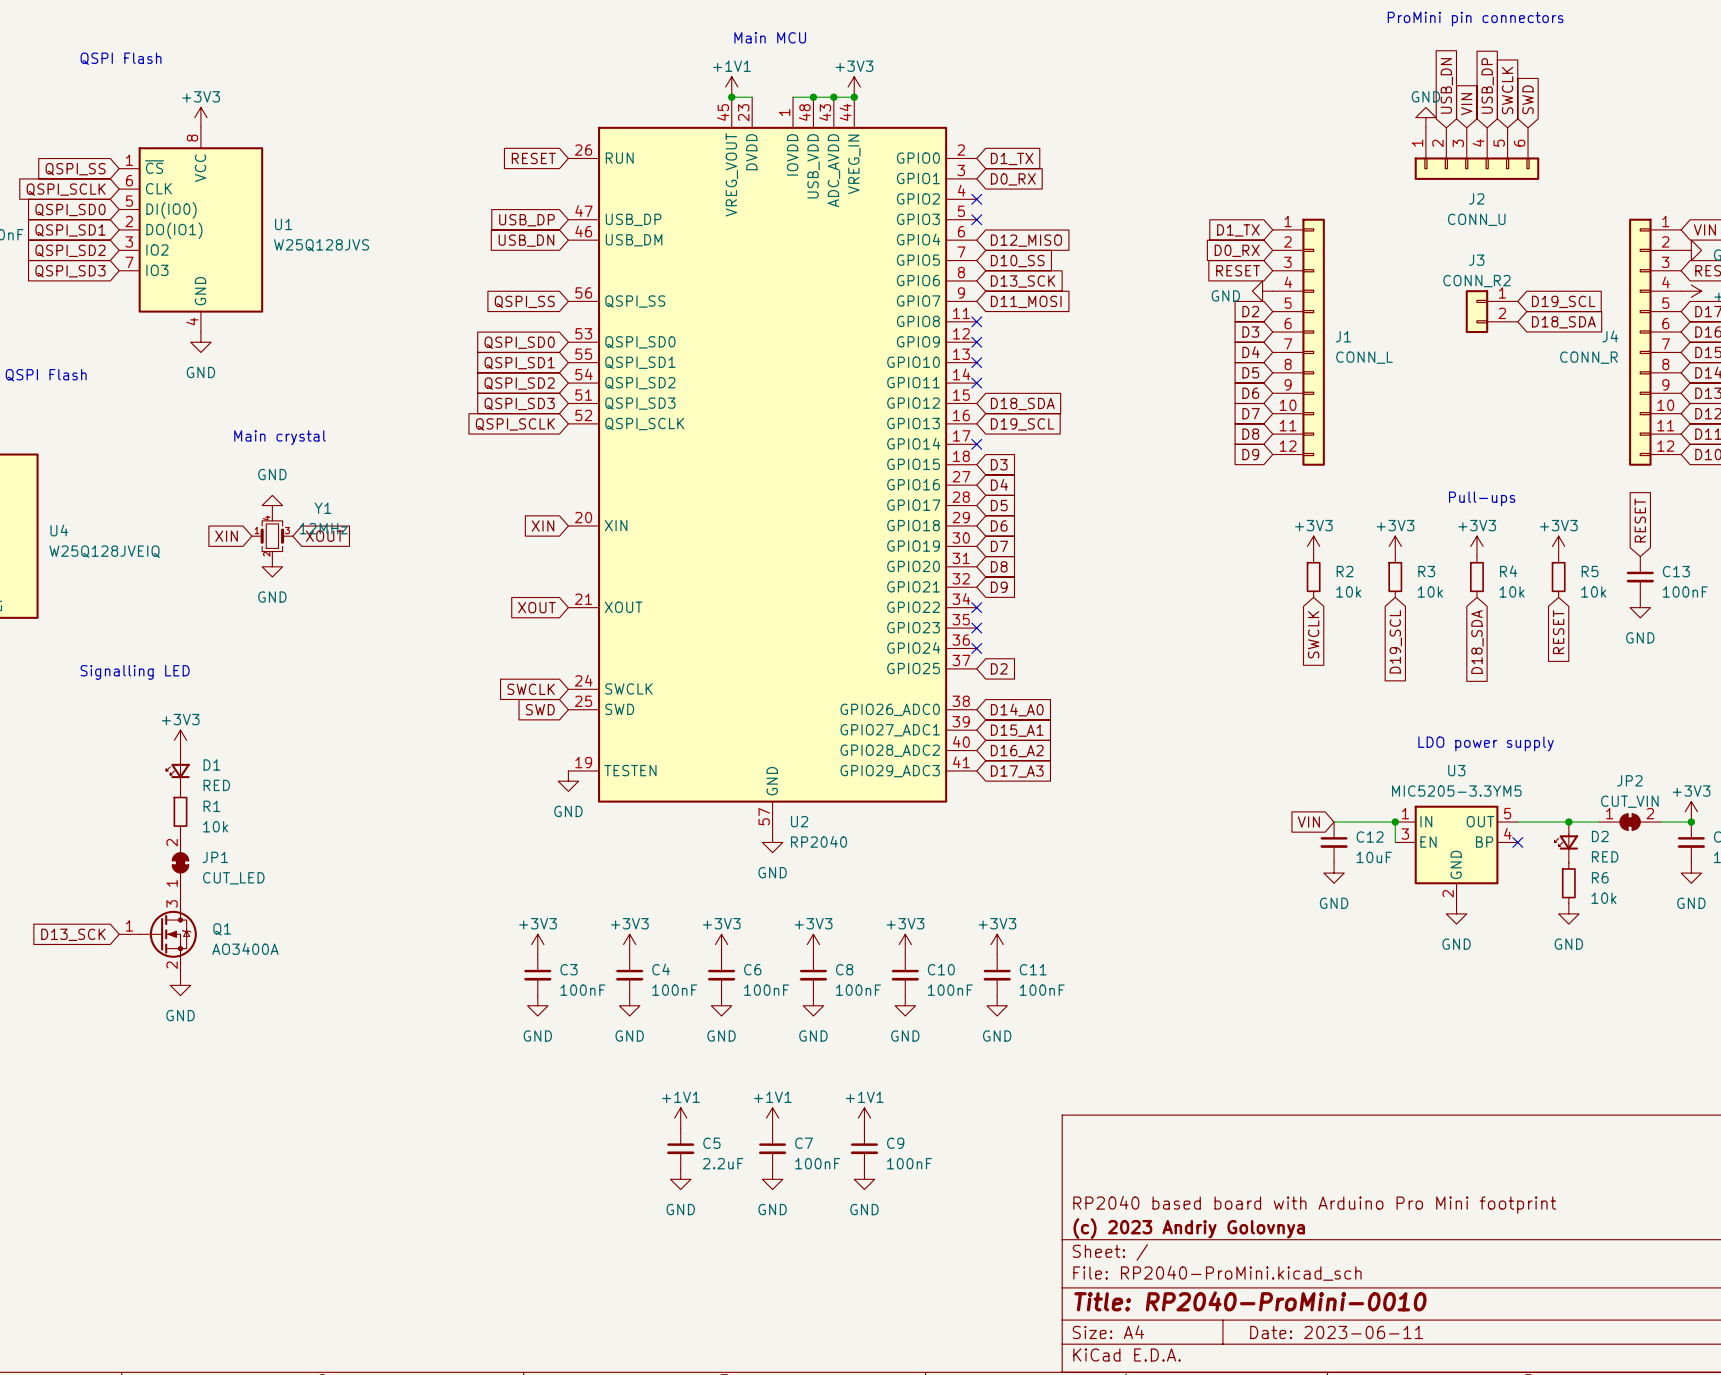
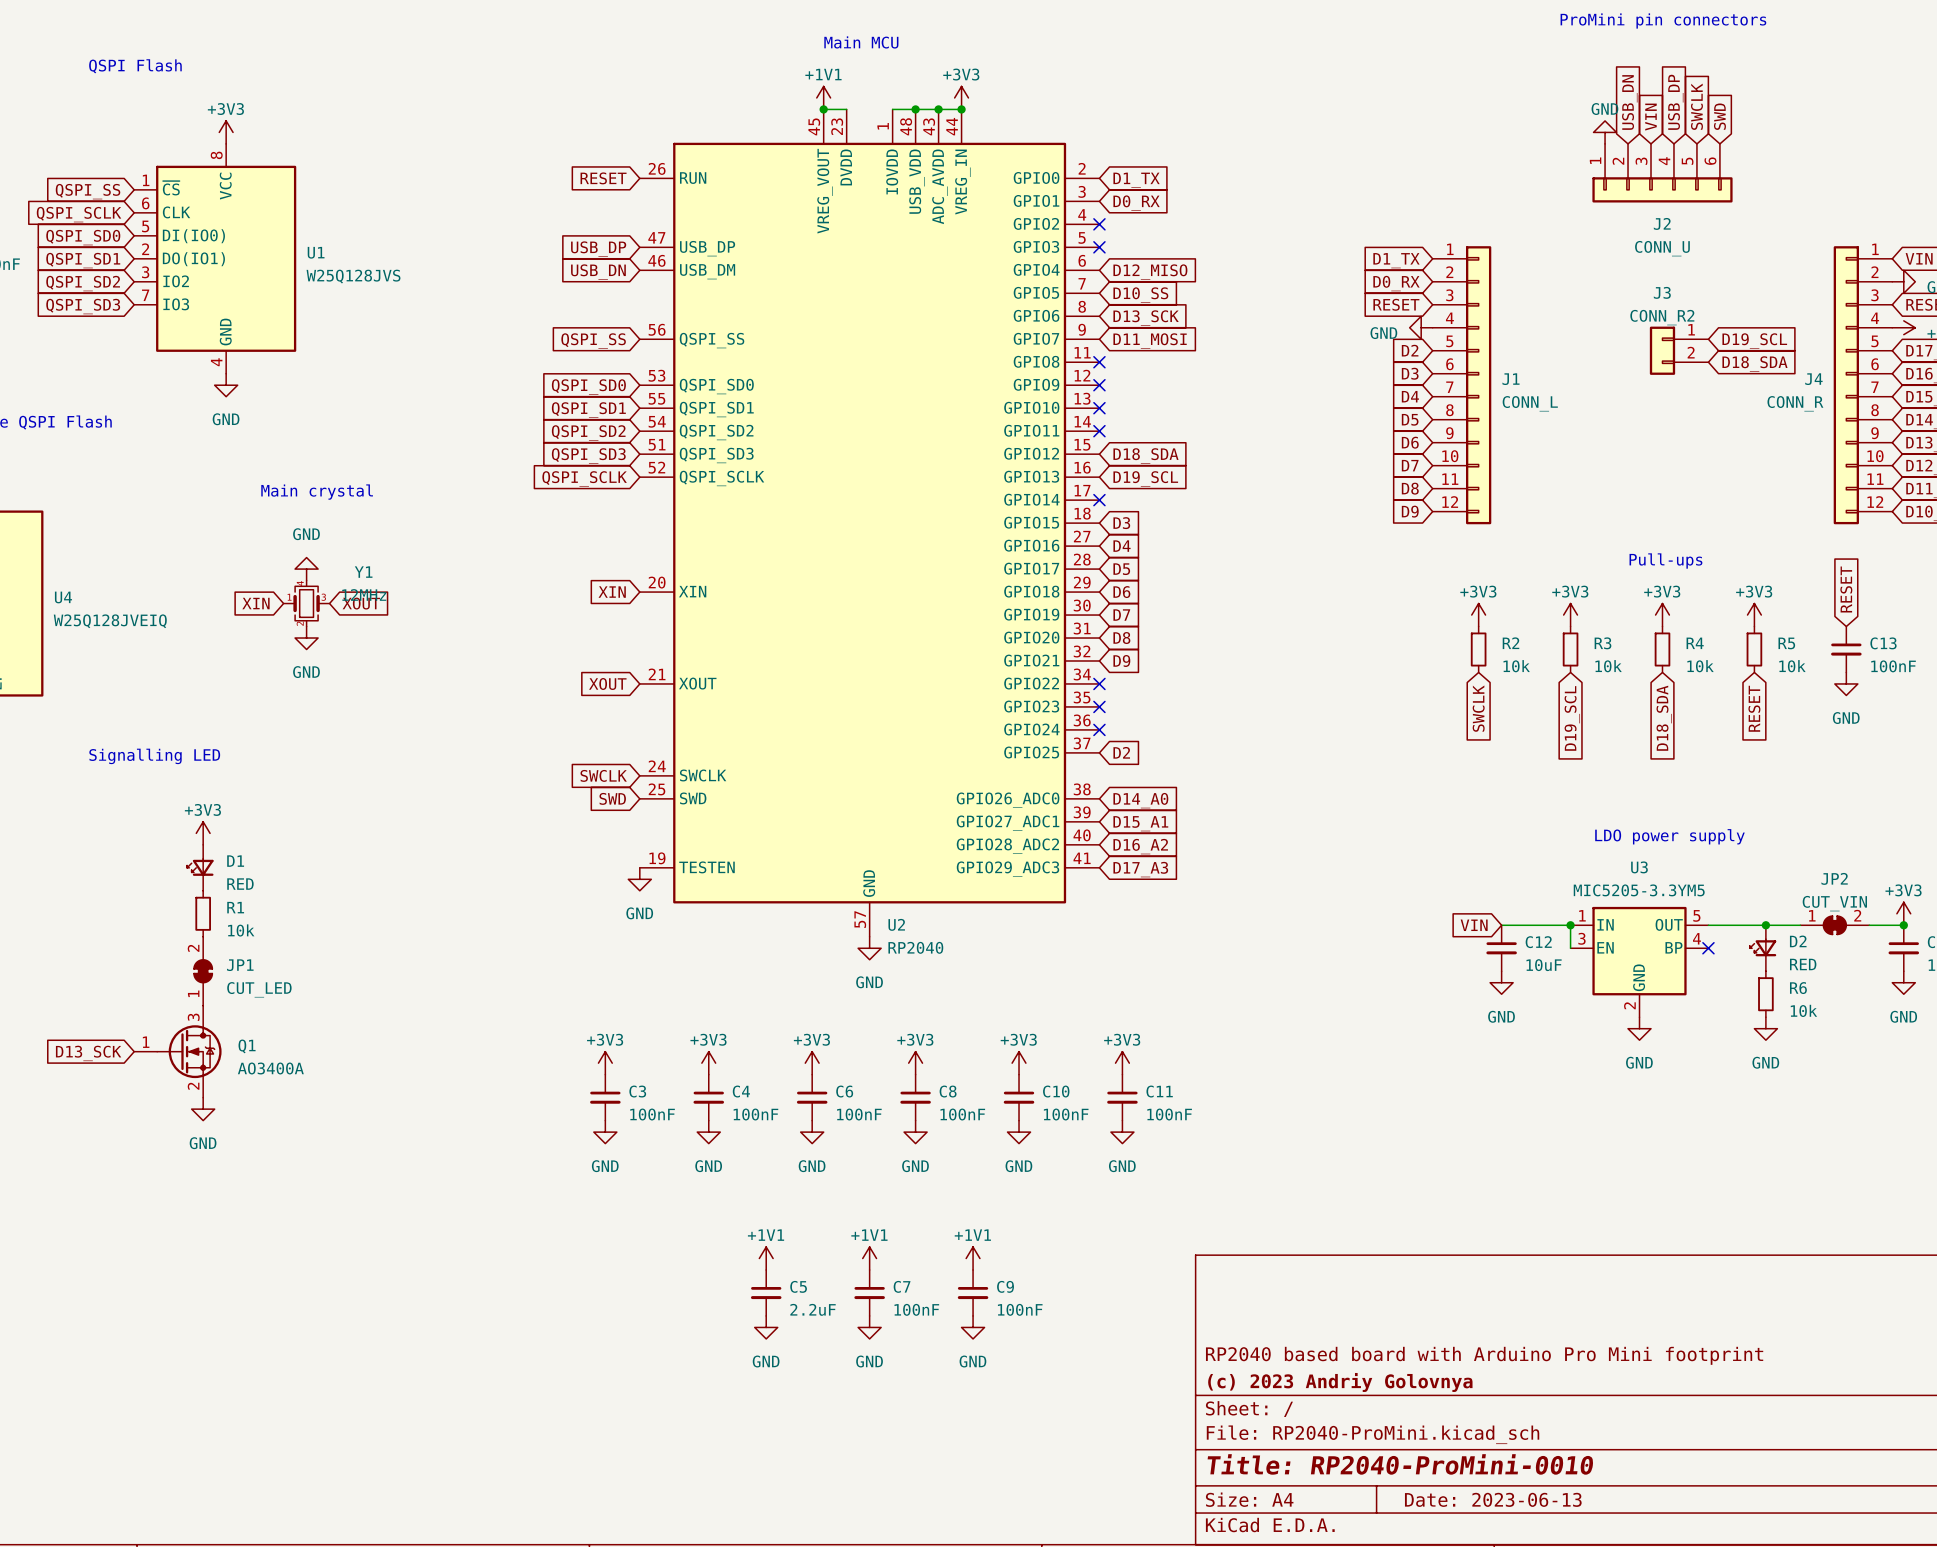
title block: Date: 2023-06-11 (1336, 1332) -> Date: 2023-06-13 (1493, 1499)

